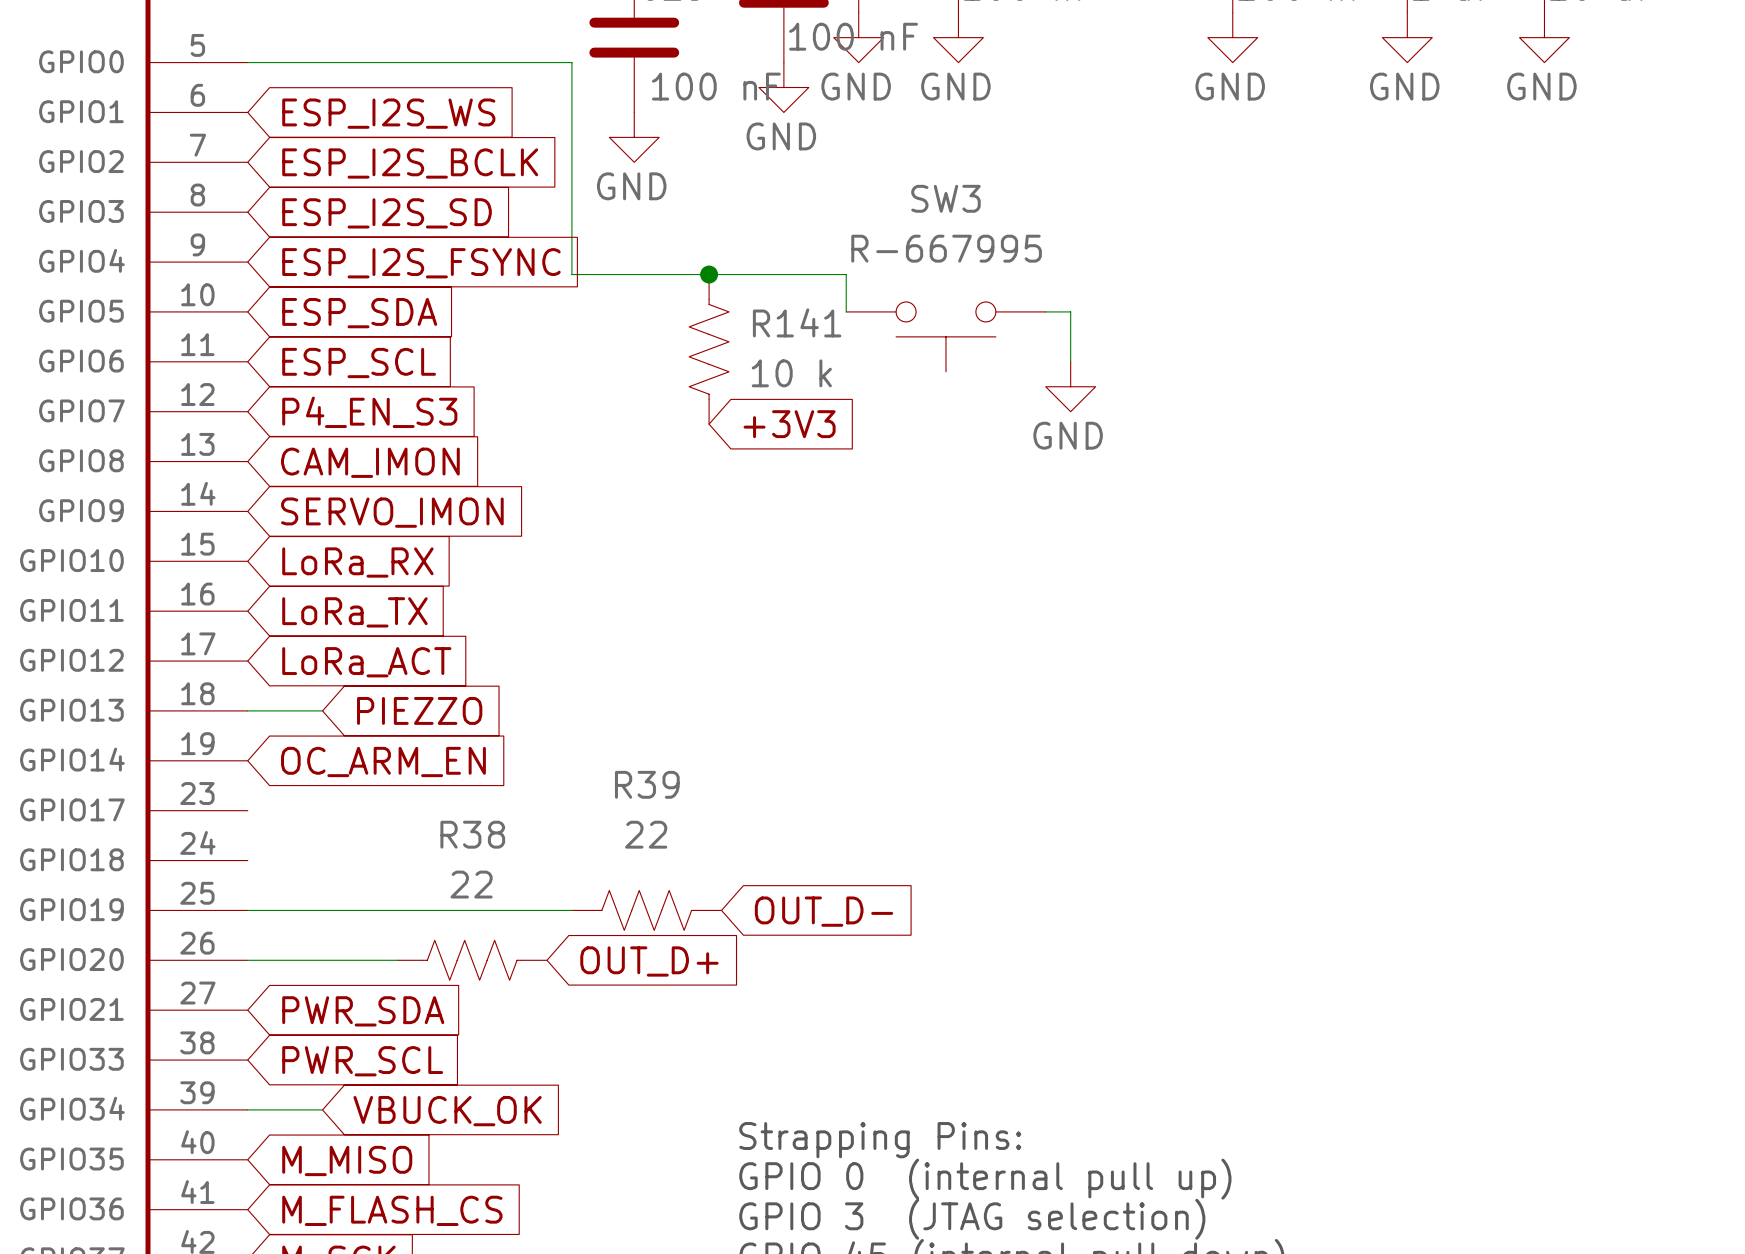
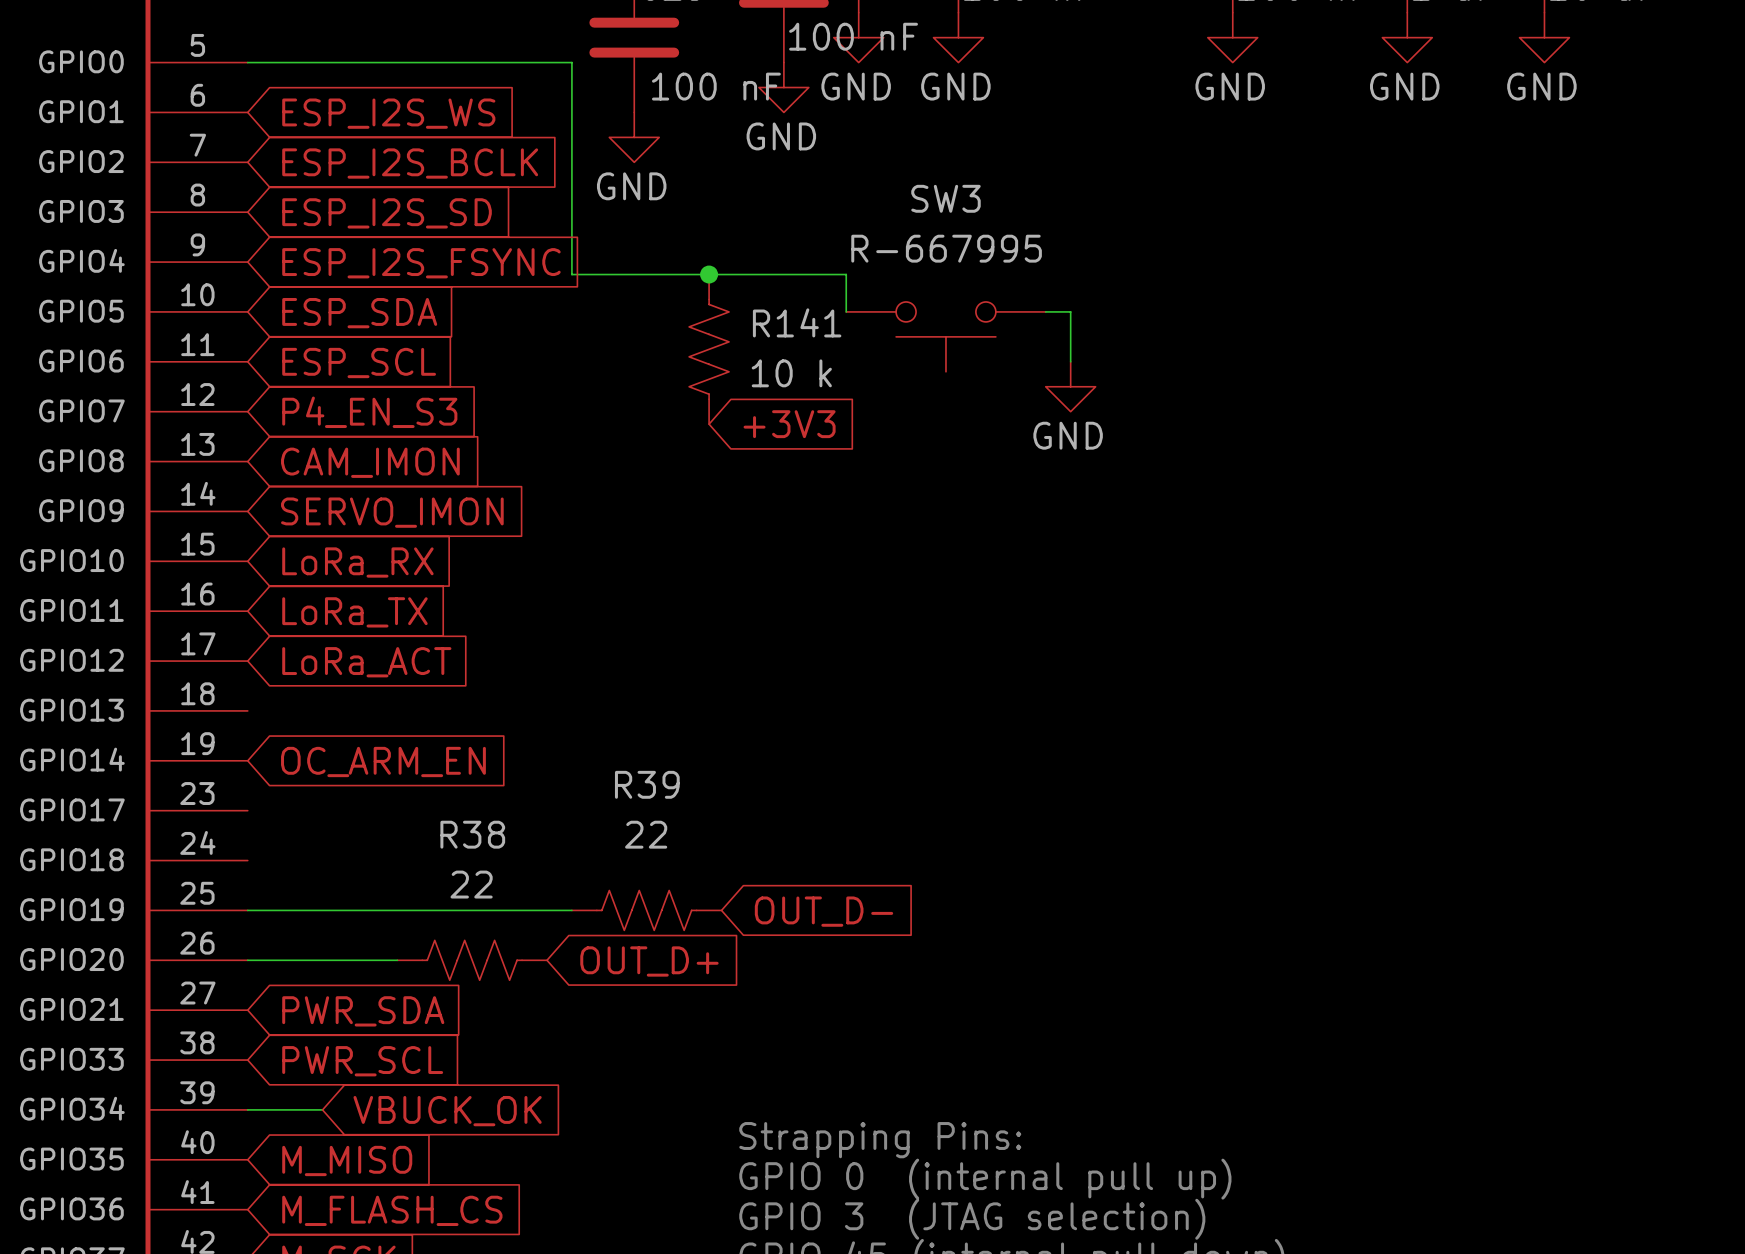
wire: (247, 710) (322, 710) -> none
global label: PIEZZO (419, 710) -> none

